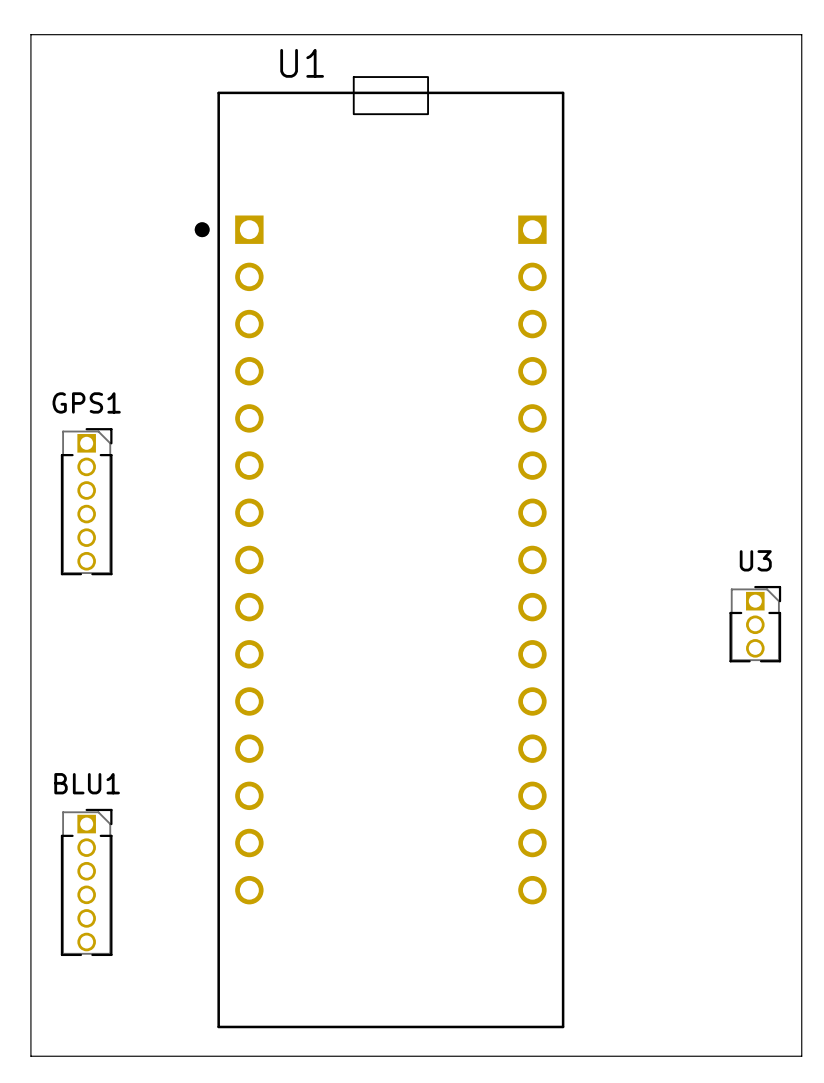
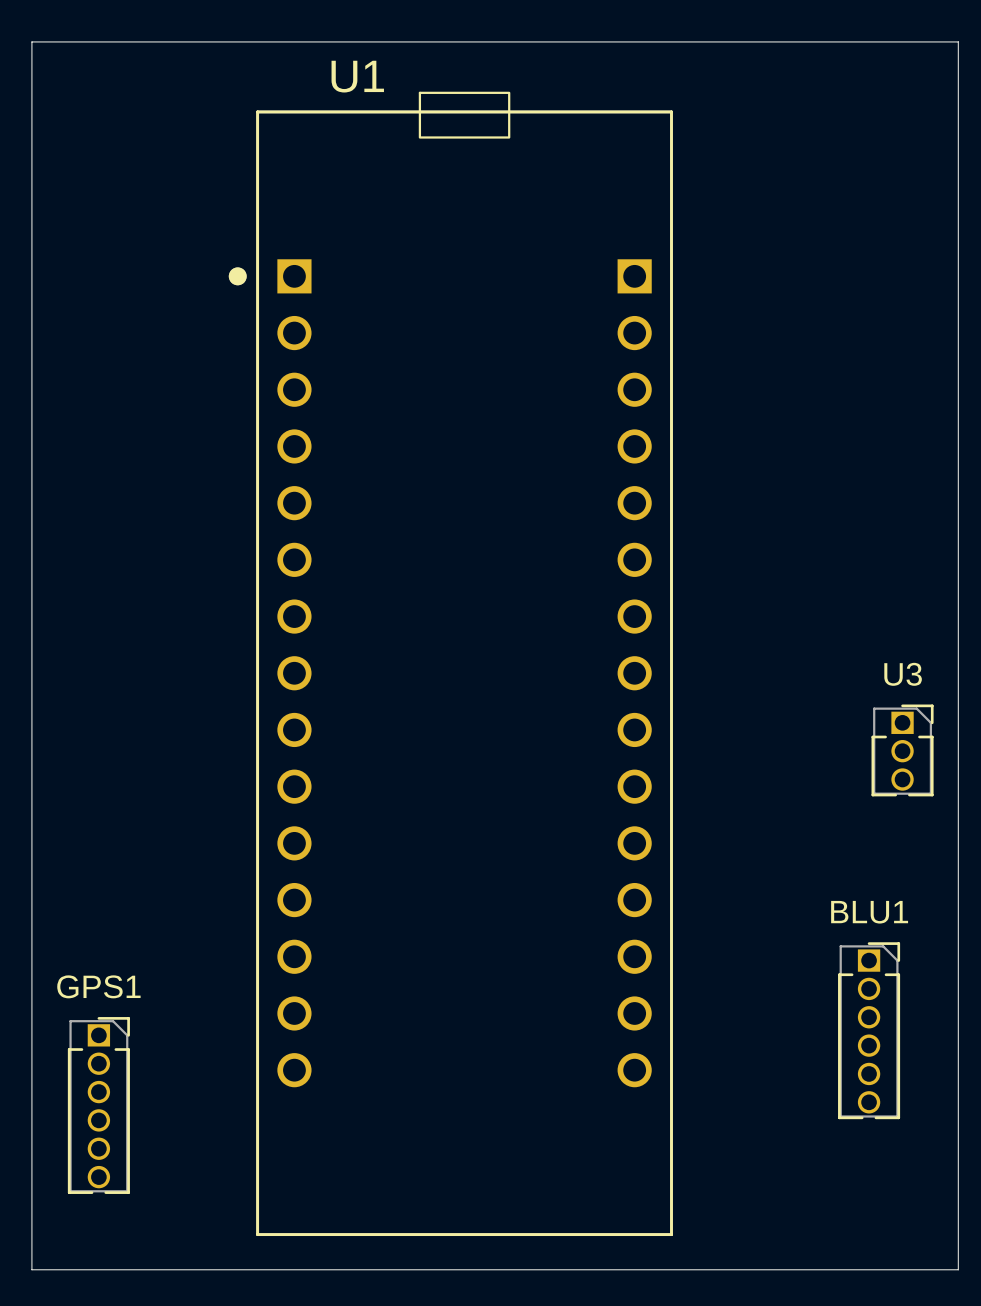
GPS1 position: (86, 501) -> (98, 1105)
BLU1 position: (86, 882) -> (869, 1030)

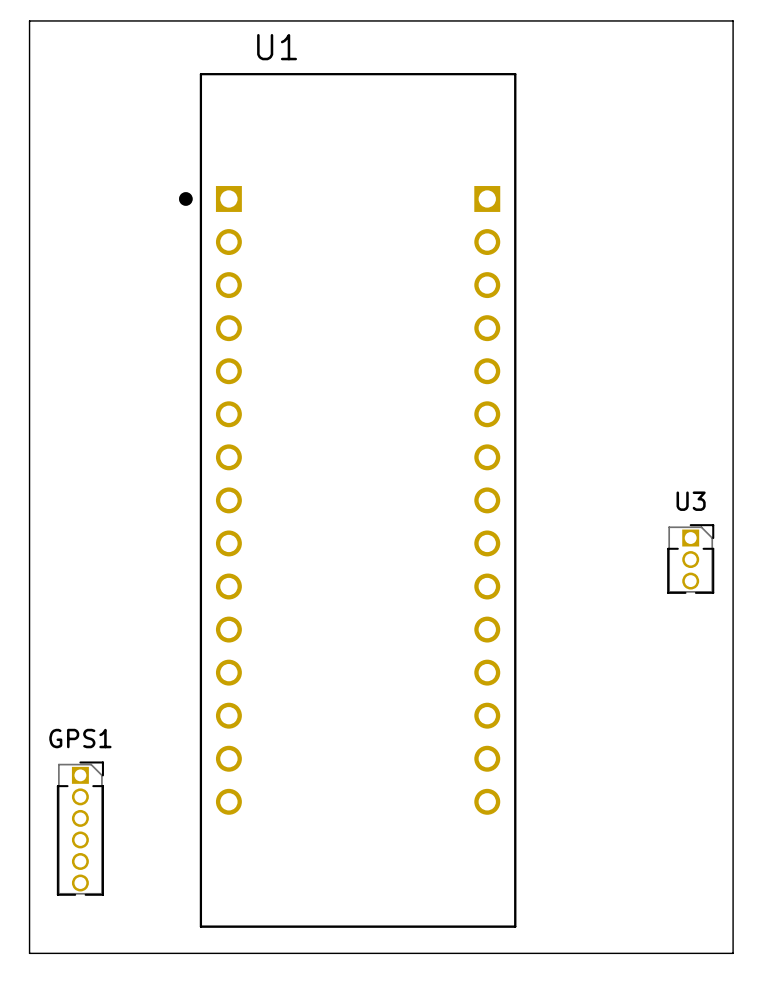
U1 footprint: [228, 91, 673, 1237] -> [179, 73, 517, 928]
BLU1: (869, 1030) -> none

